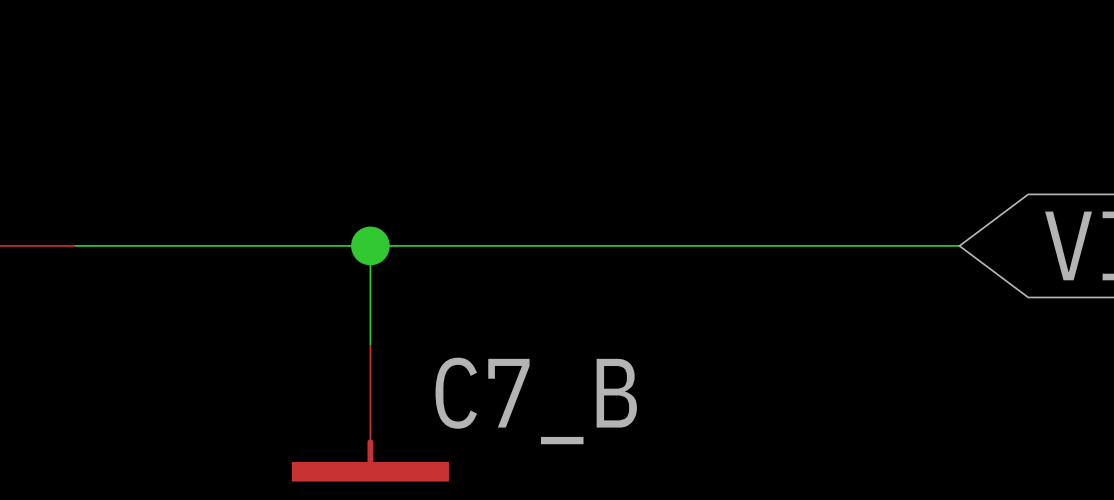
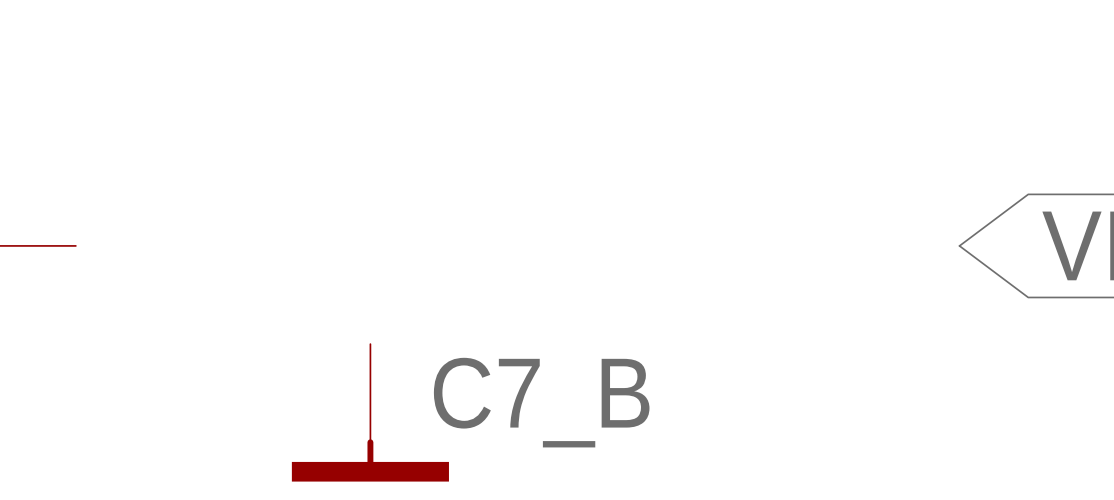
wire: (75, 245) (959, 245) -> none
wire: (370, 245) (370, 344) -> none
junction: (370, 245) -> none

